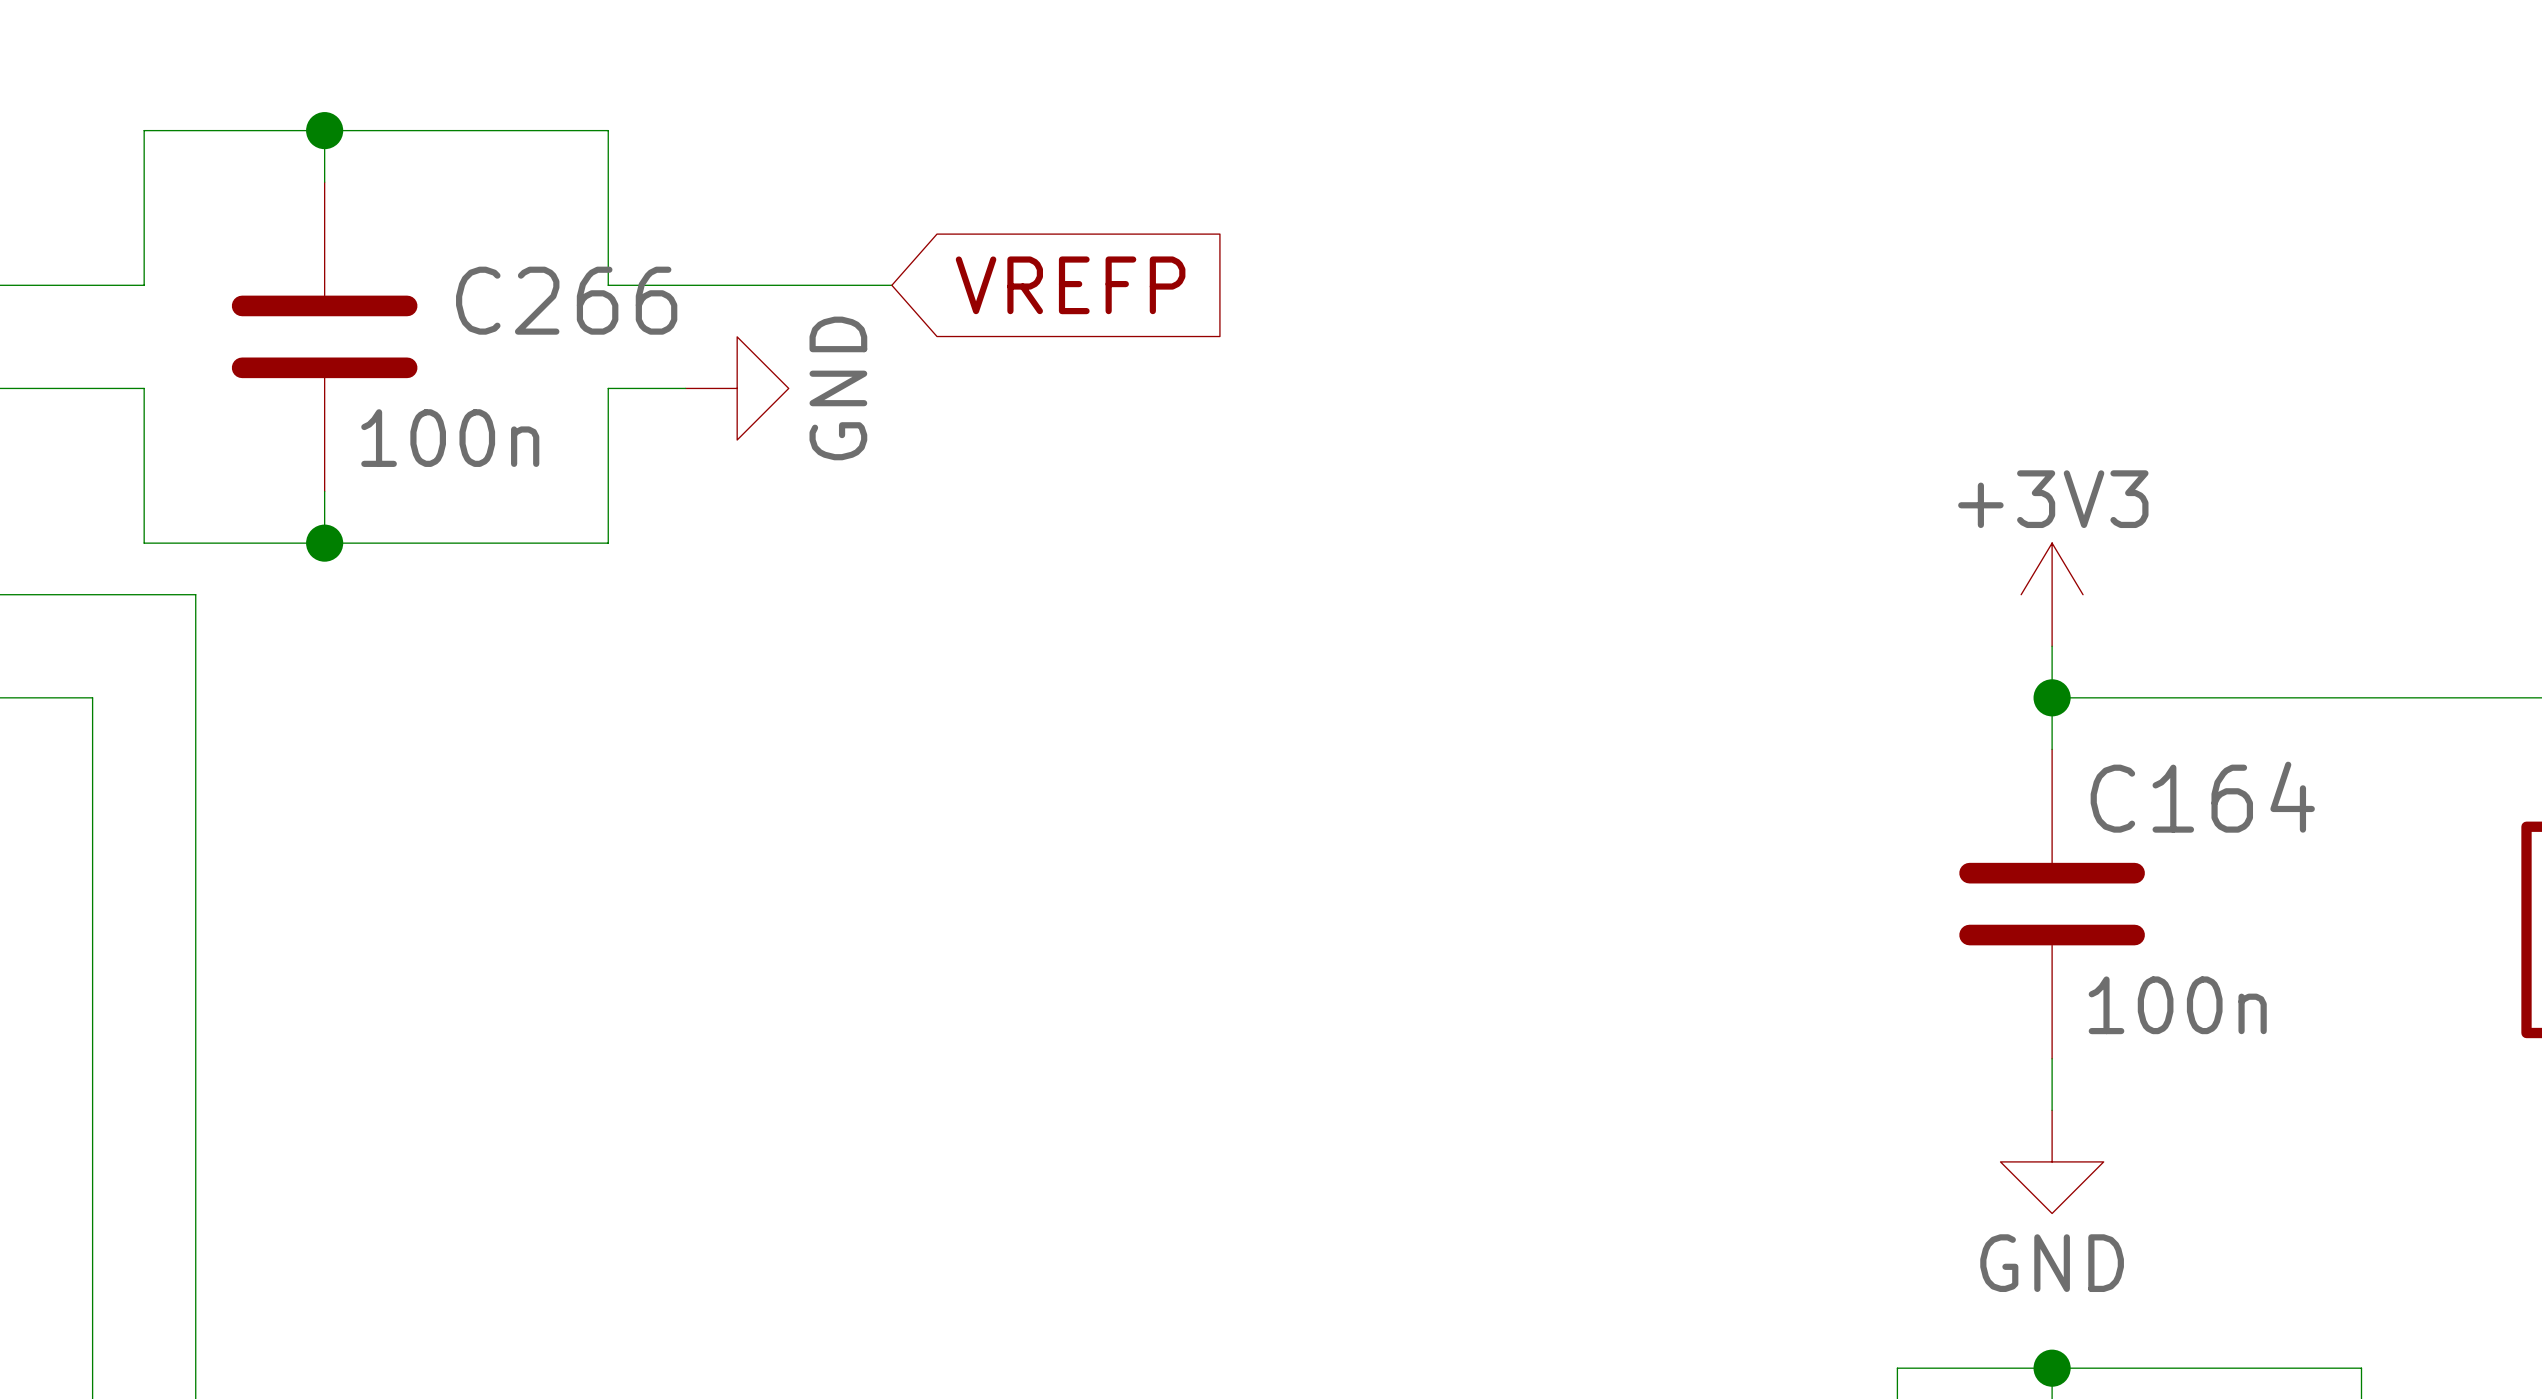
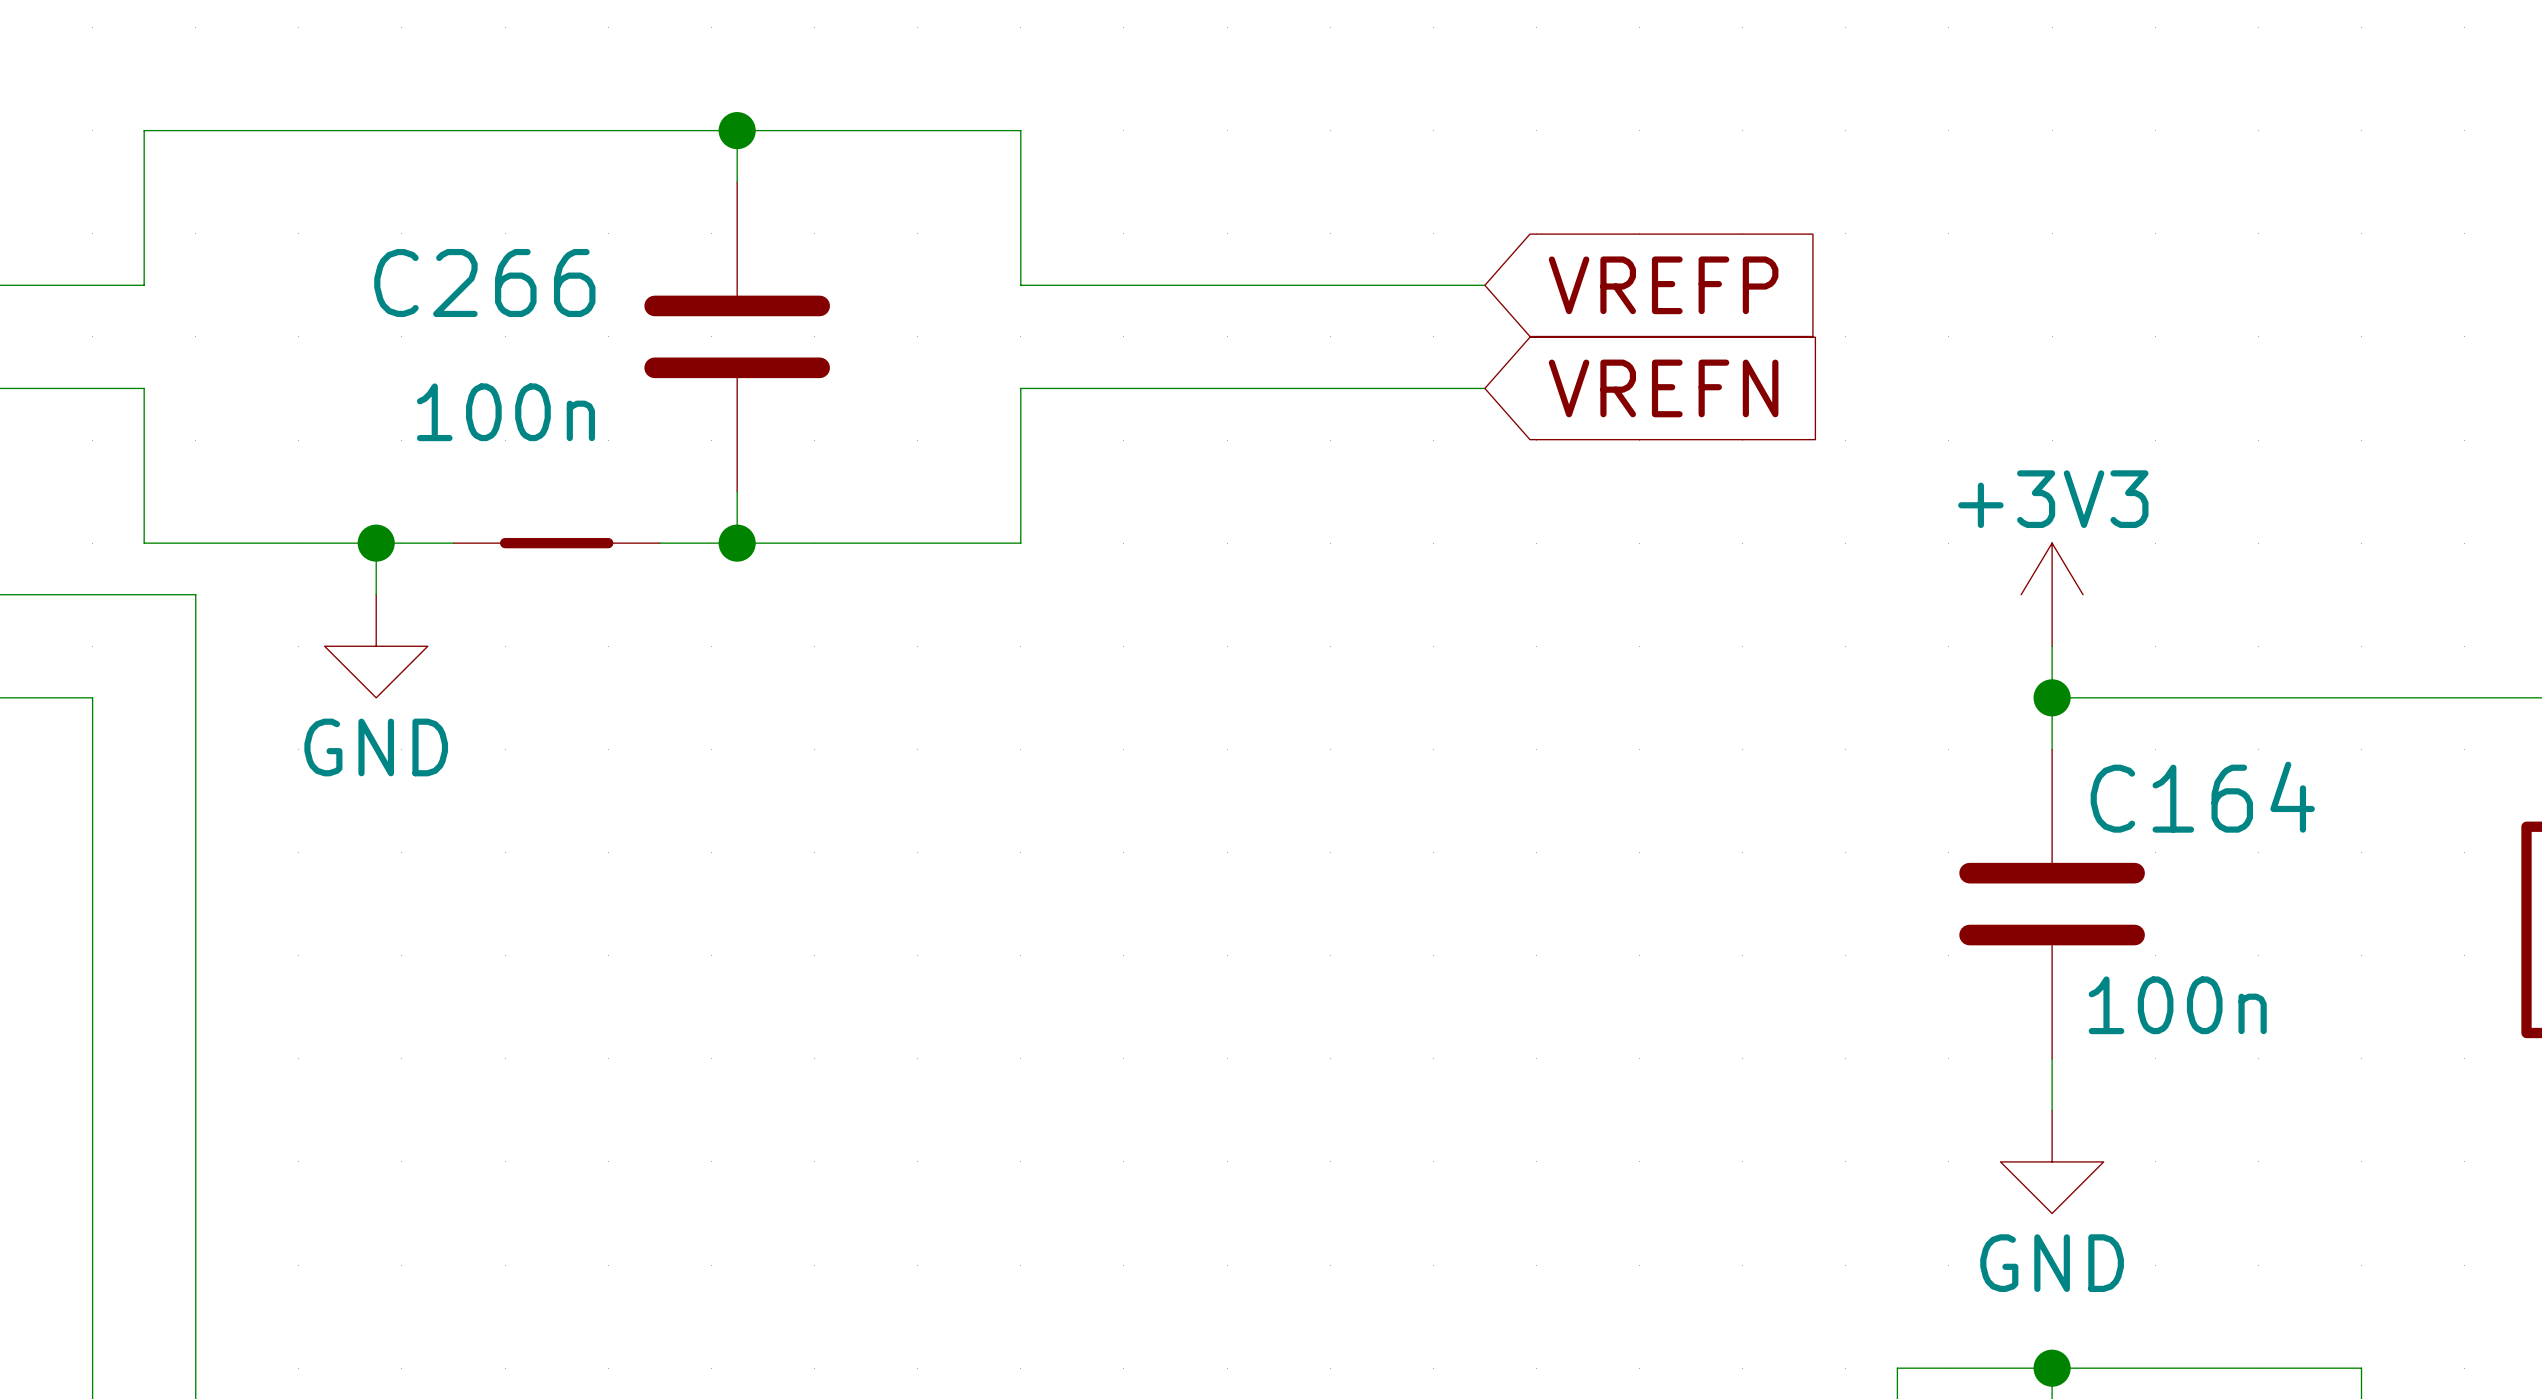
wire: (324, 130) (324, 182) -> (737, 130) (737, 182)
junction: (324, 130) -> none
wire: (608, 130) (608, 285) (891, 285) -> (608, 130) (1020, 130) (1020, 285) (1484, 285)
junction: none -> (737, 130)
global label position: VREFP (1070, 285) -> VREFP (1663, 285)
C266 name position: C266 (566, 300) -> C266 (484, 282)
C266 position: (324, 336) -> (737, 336)
wire: (685, 388) (608, 388) (608, 543) (453, 543) -> none
power symbol rotation: 0° (737, 388) -> 90° clockwise (376, 646)
power symbol position: GND (737, 388) -> GND (376, 646)
wire: none -> (1484, 388) (1020, 388) (1020, 543) (659, 543)
global label: none -> VREFN (1663, 388)
C266 text position: 100n (450, 438) -> 100n (505, 412)
wire: (324, 491) (324, 543) -> (737, 491) (737, 543)
junction position: (324, 543) -> (376, 543)
wire: none -> (376, 543) (376, 594)
part: none -> (556, 543)
junction: none -> (737, 543)

